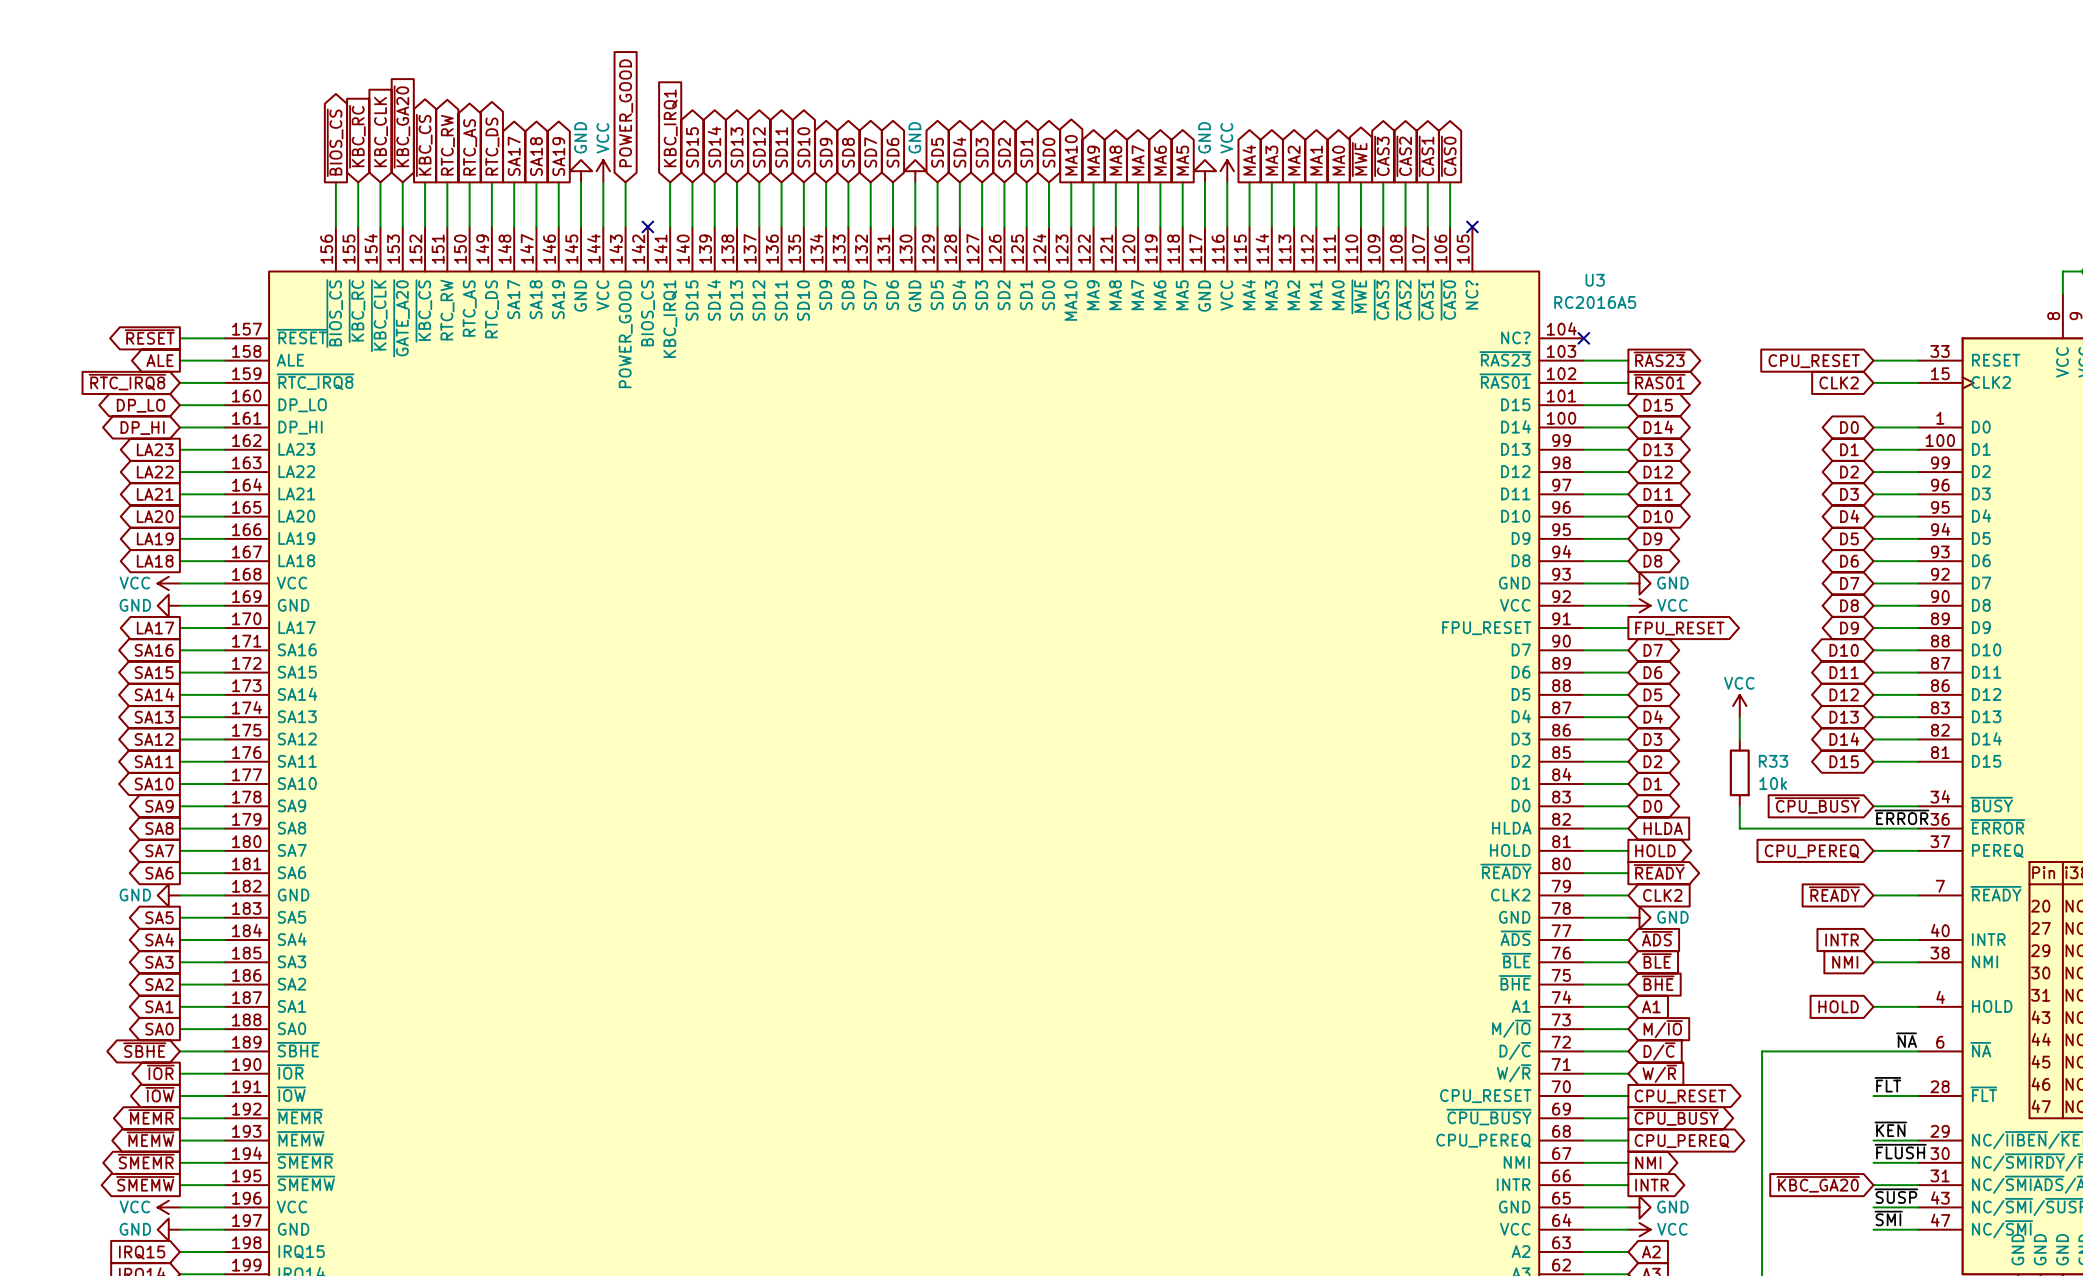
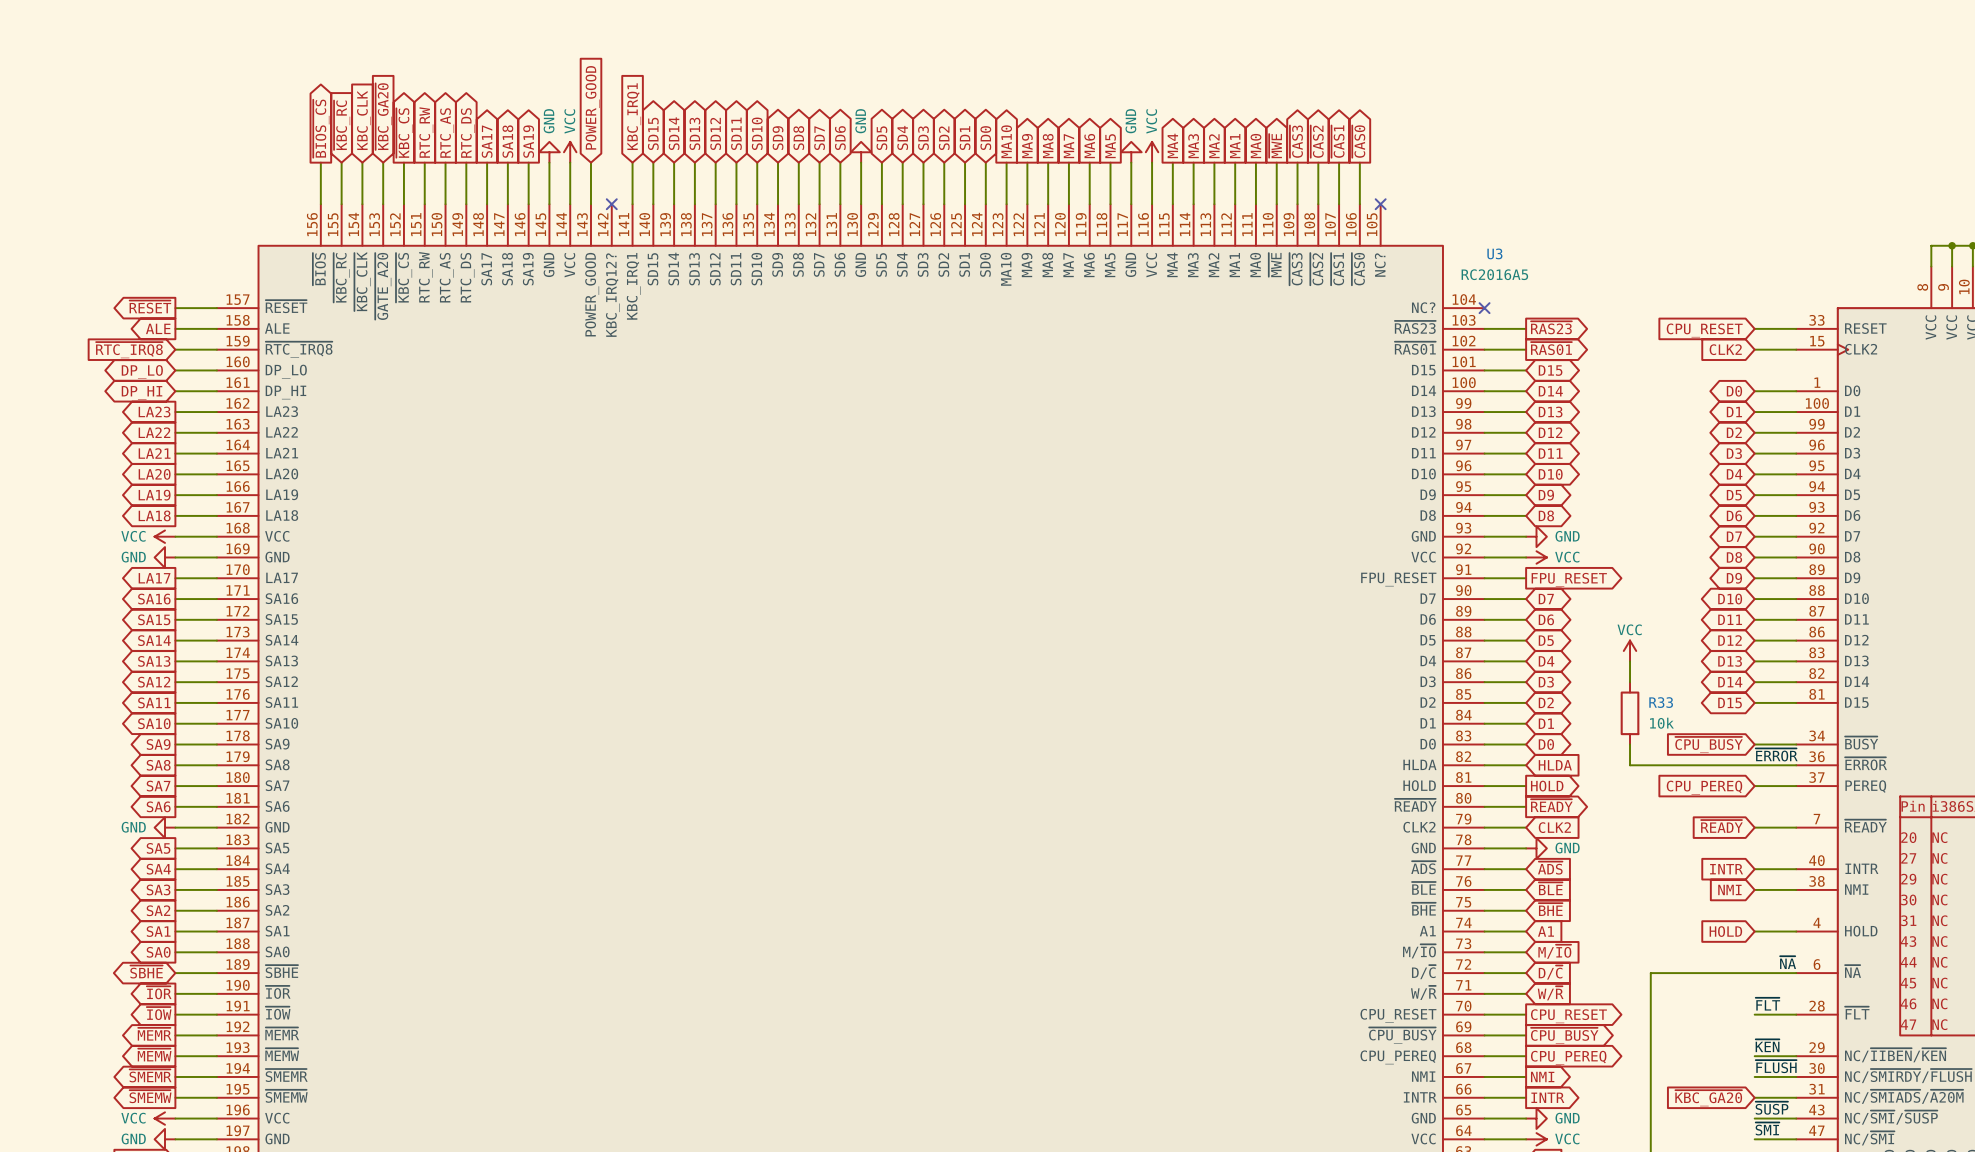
U3 pin name: ~{BIOS_CS} (334, 313) -> ~{BIOS} (319, 269)
U3 pin name: BIOS_CS (647, 313) -> KBC_IRQ12? (612, 295)

